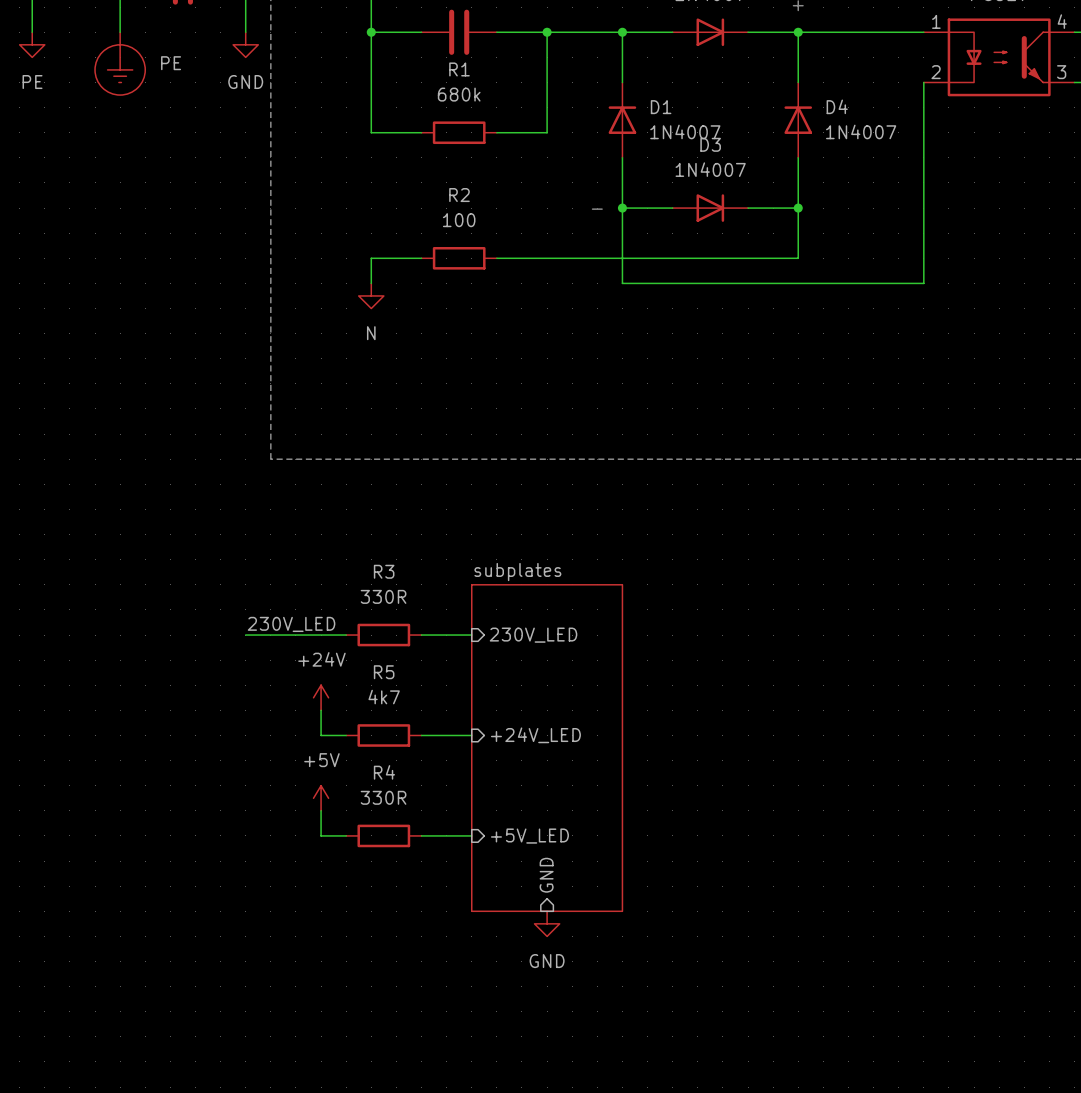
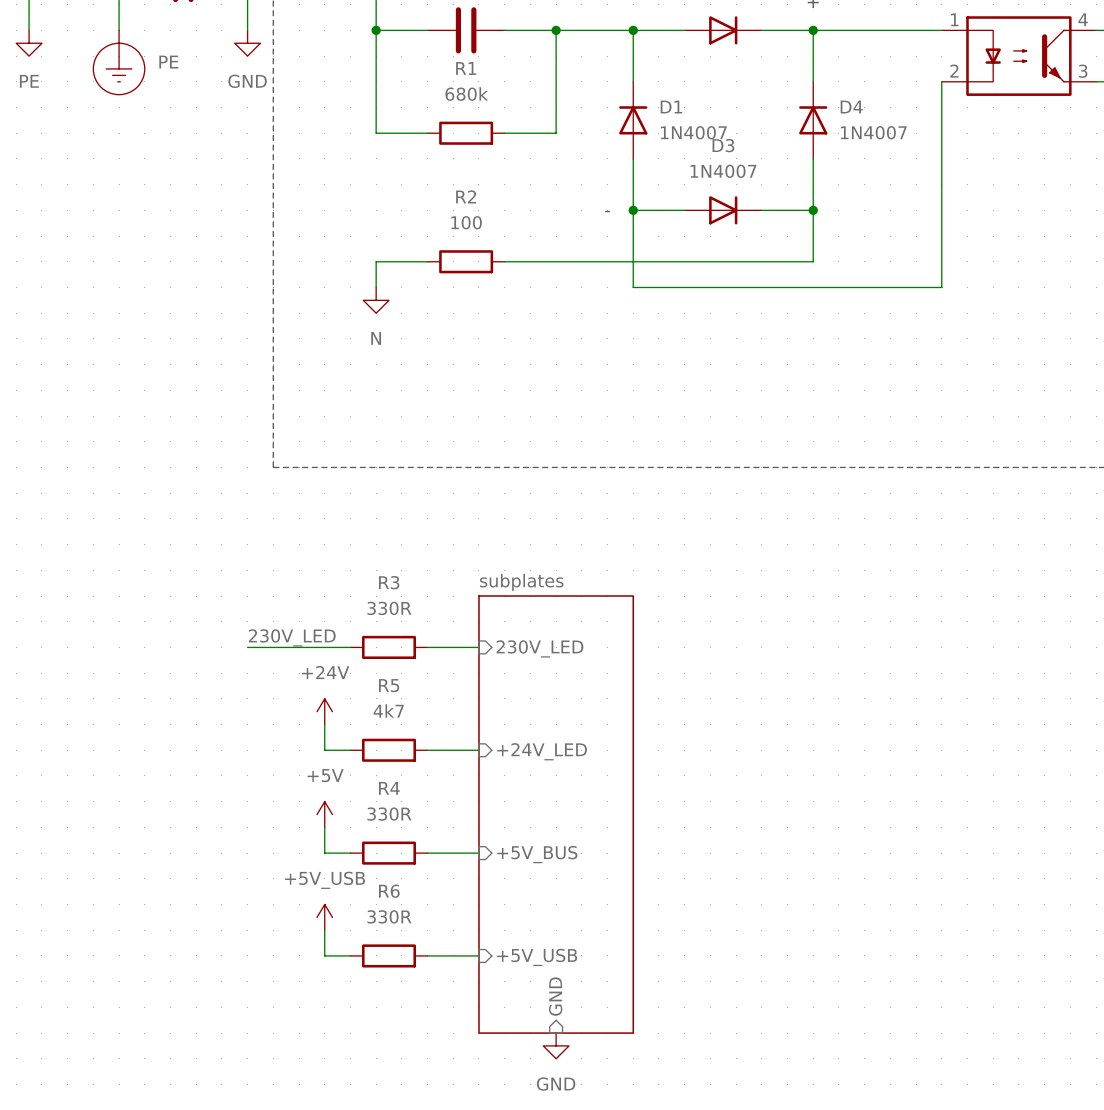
sheet subplates: (547, 748) -> none
sheet subplates: none -> (556, 814)
sheet pin: +5V_LED (529, 836) -> +5V_BUS (537, 854)
sheet pin position: GND (546, 875) -> GND (555, 996)
power symbol: none -> +5V_USB (324, 917)
wire: none -> (324, 930) (324, 955) (350, 955)
power symbol position: GND (547, 923) -> GND (556, 1045)
R6: none -> 330R (389, 955)
wire: none -> (427, 955) (478, 955)
sheet pin: none -> +5V_USB (537, 957)

